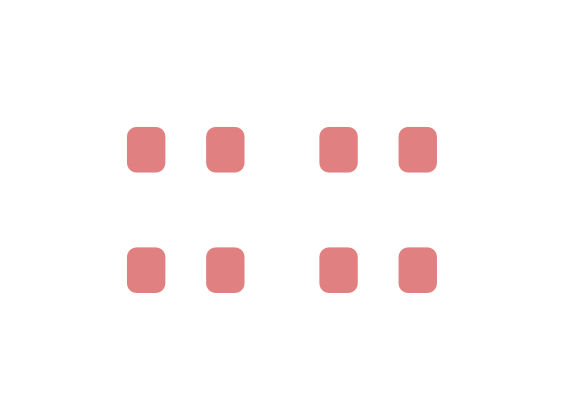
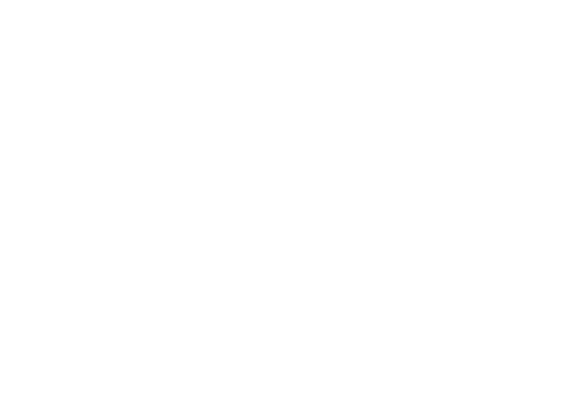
part: (185, 149) -> none
part: (378, 149) -> none
part: (185, 270) -> none
part: (378, 270) -> none

